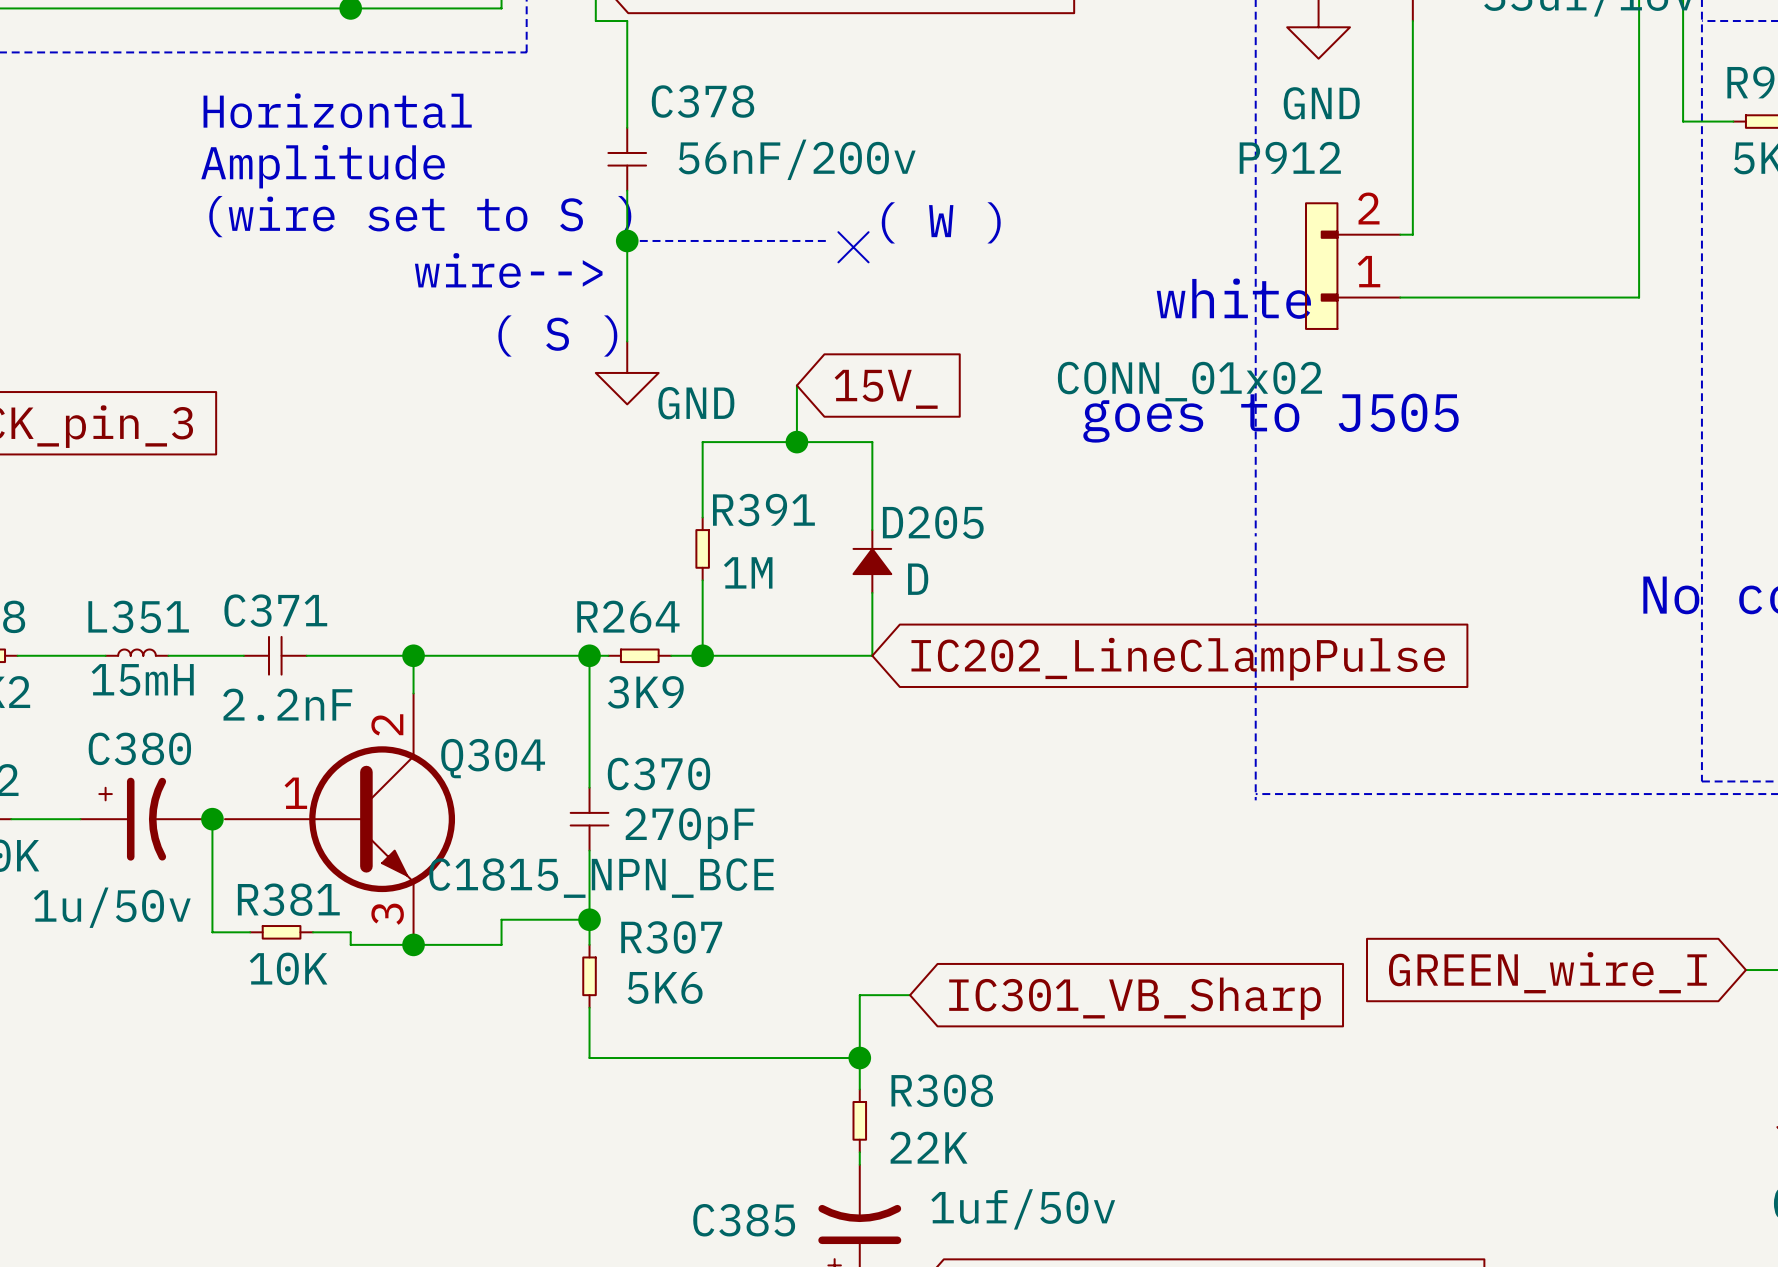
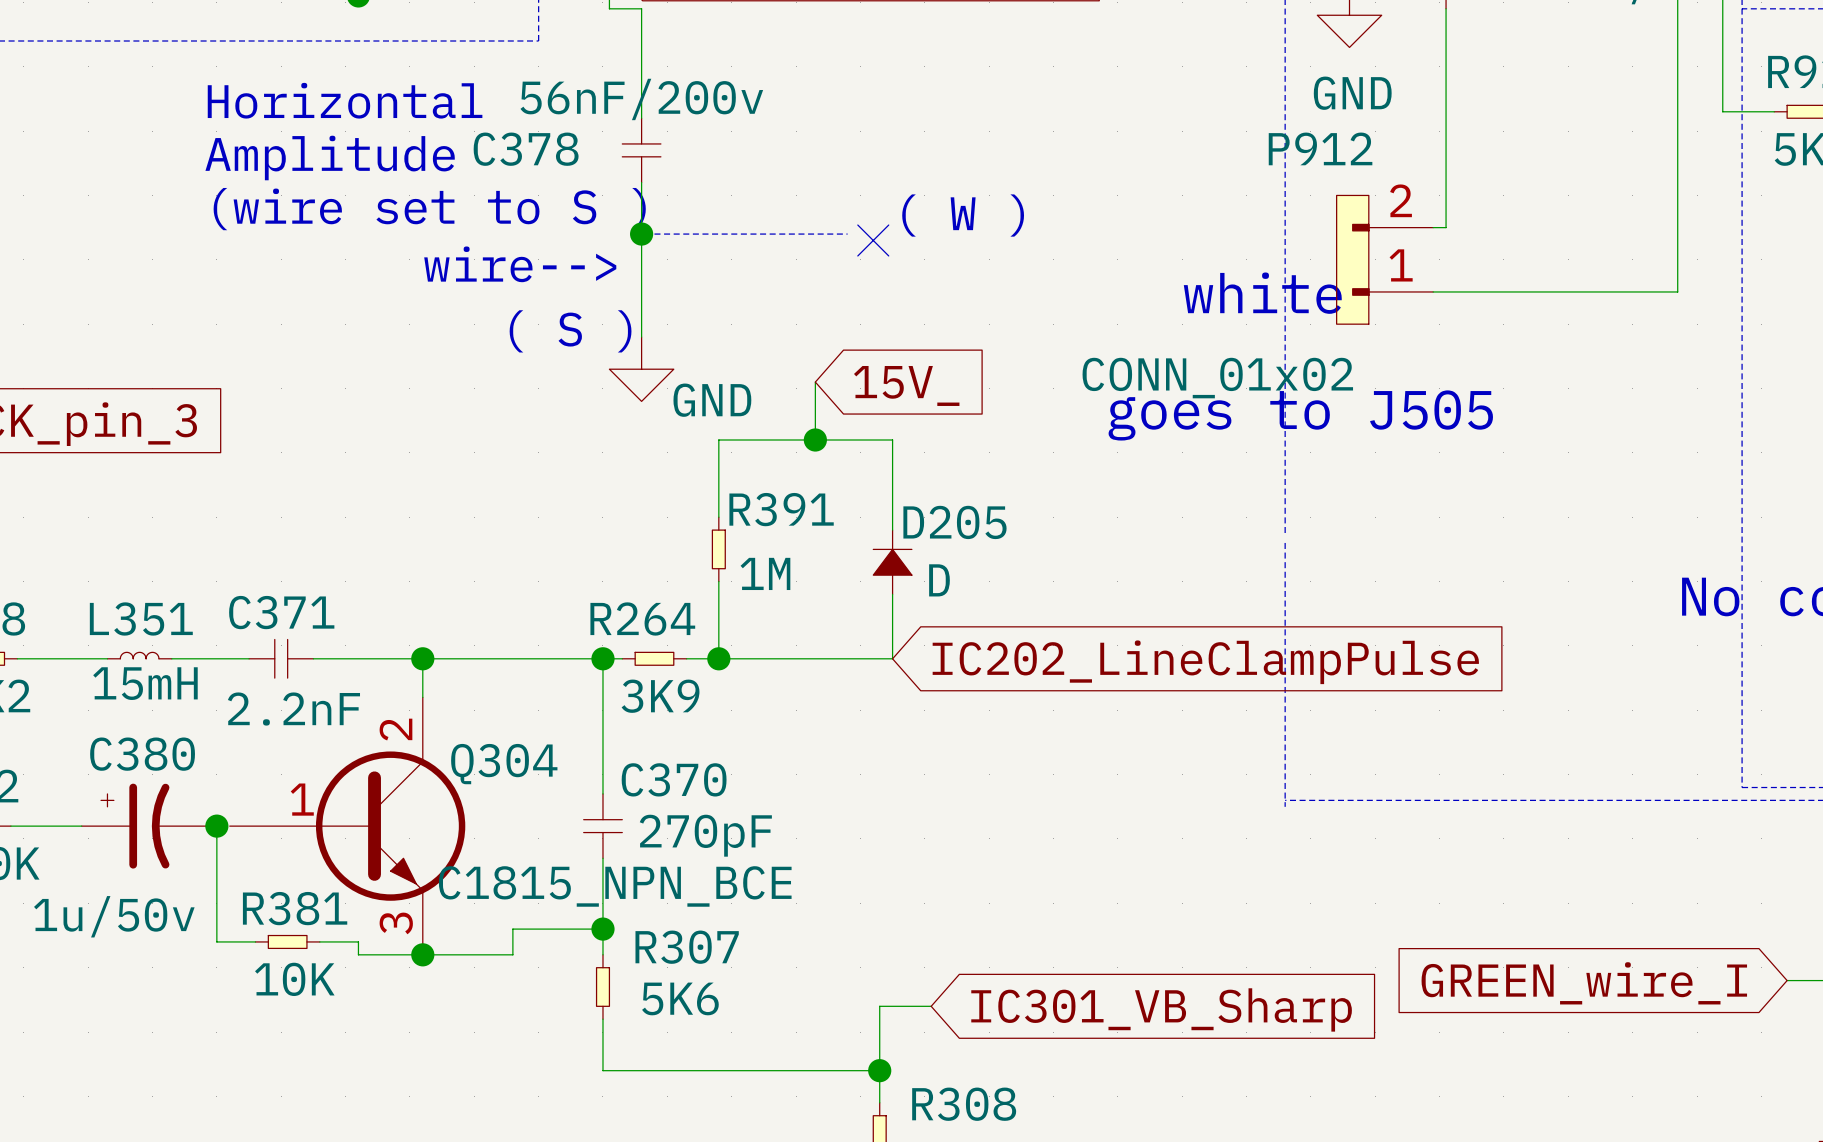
C378 name position: C378 (702, 101) -> C378 (526, 149)
C378 value position: 56nF/200v (797, 159) -> 56nF/200v (641, 99)

